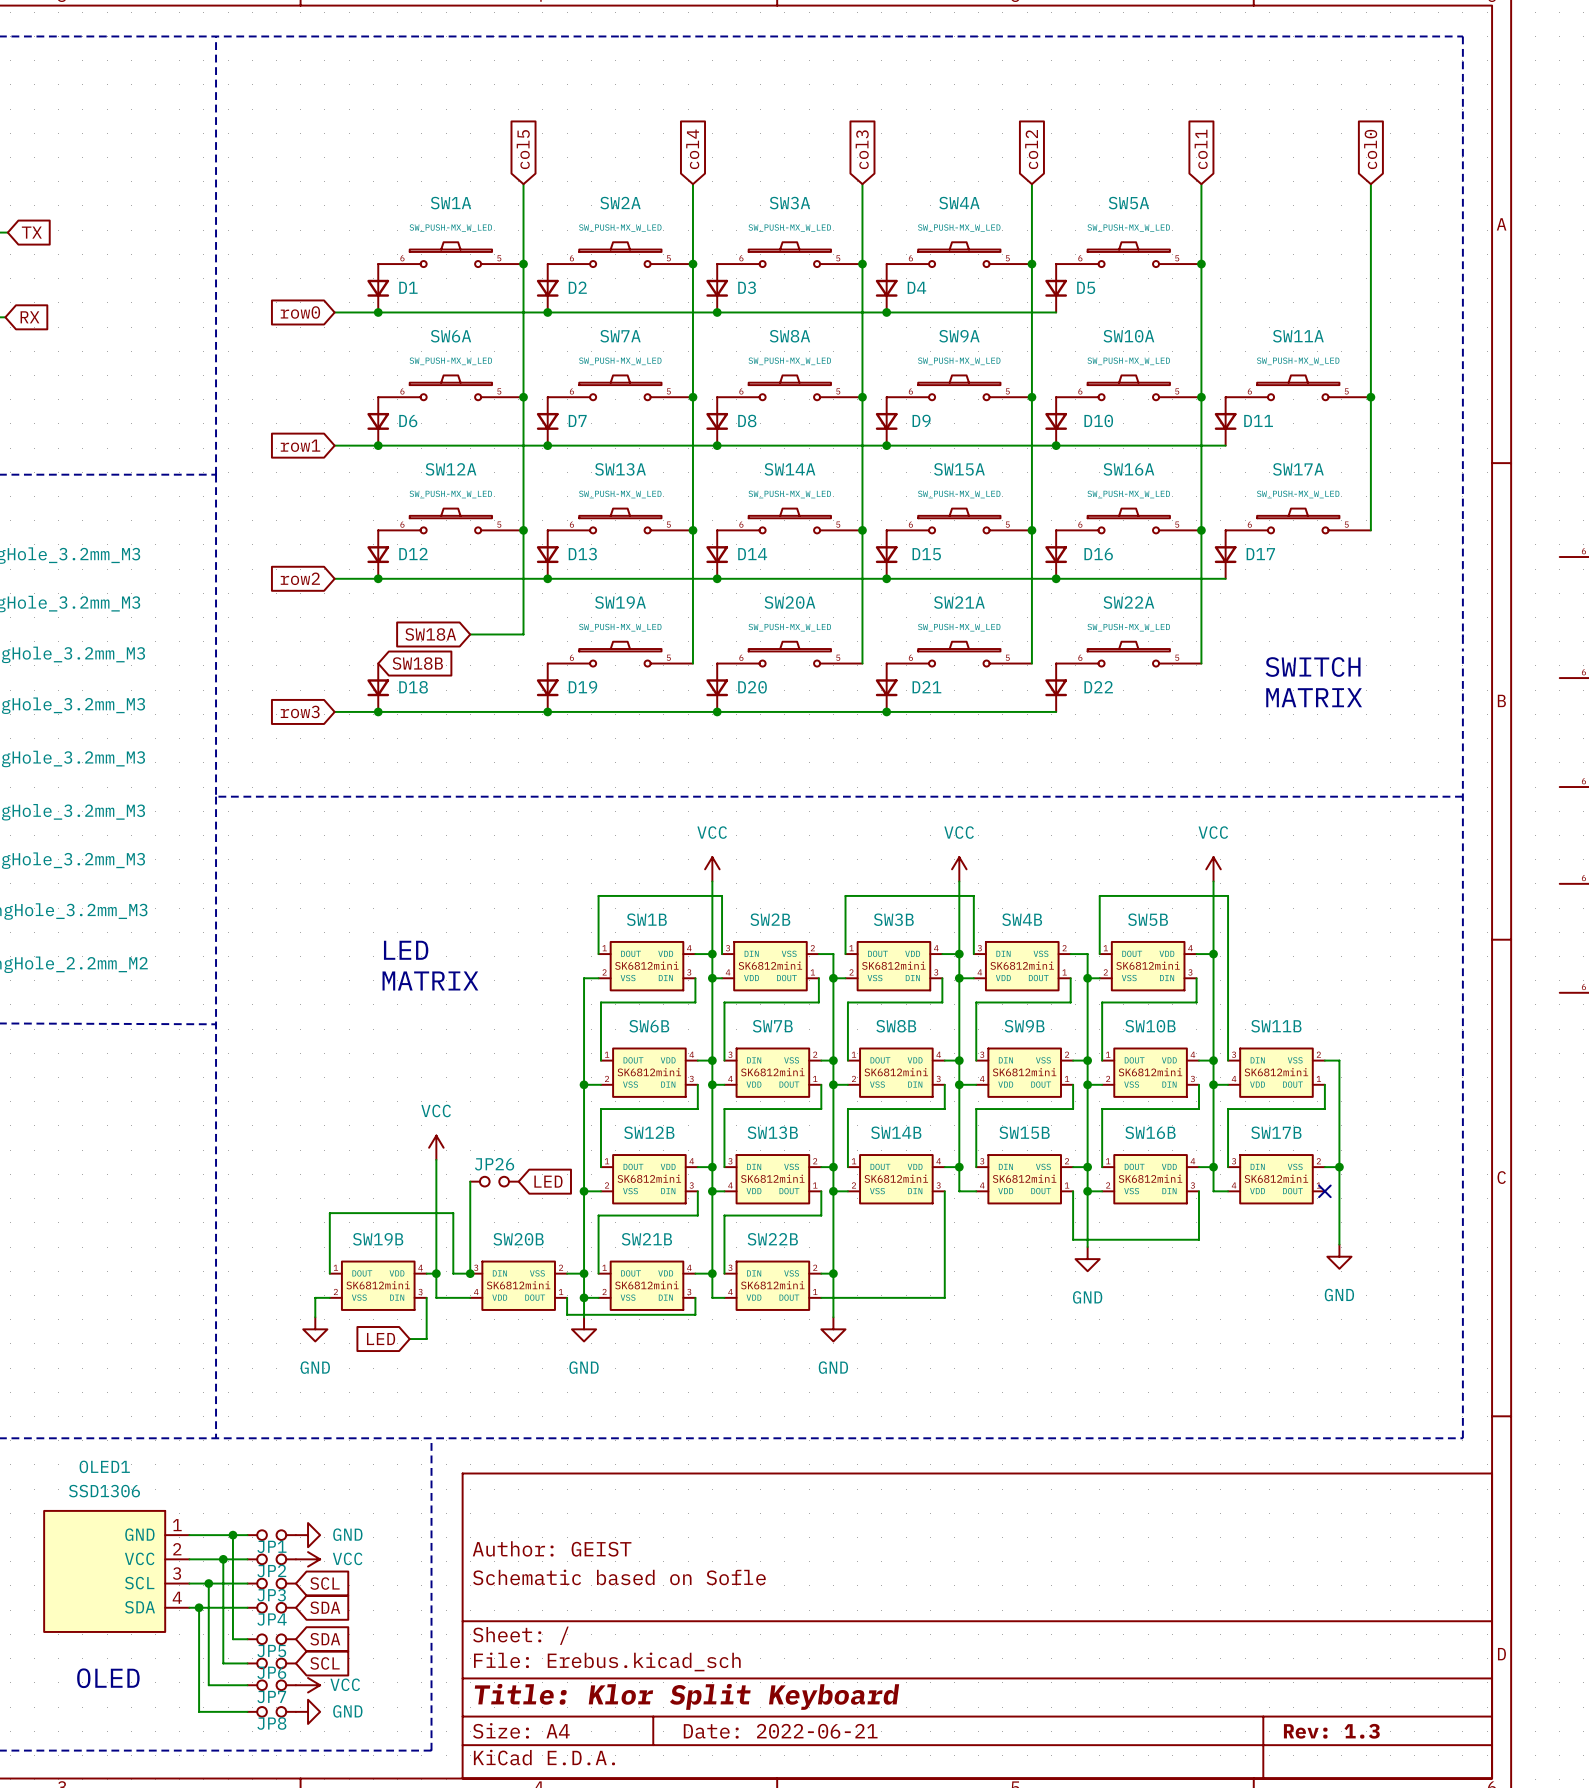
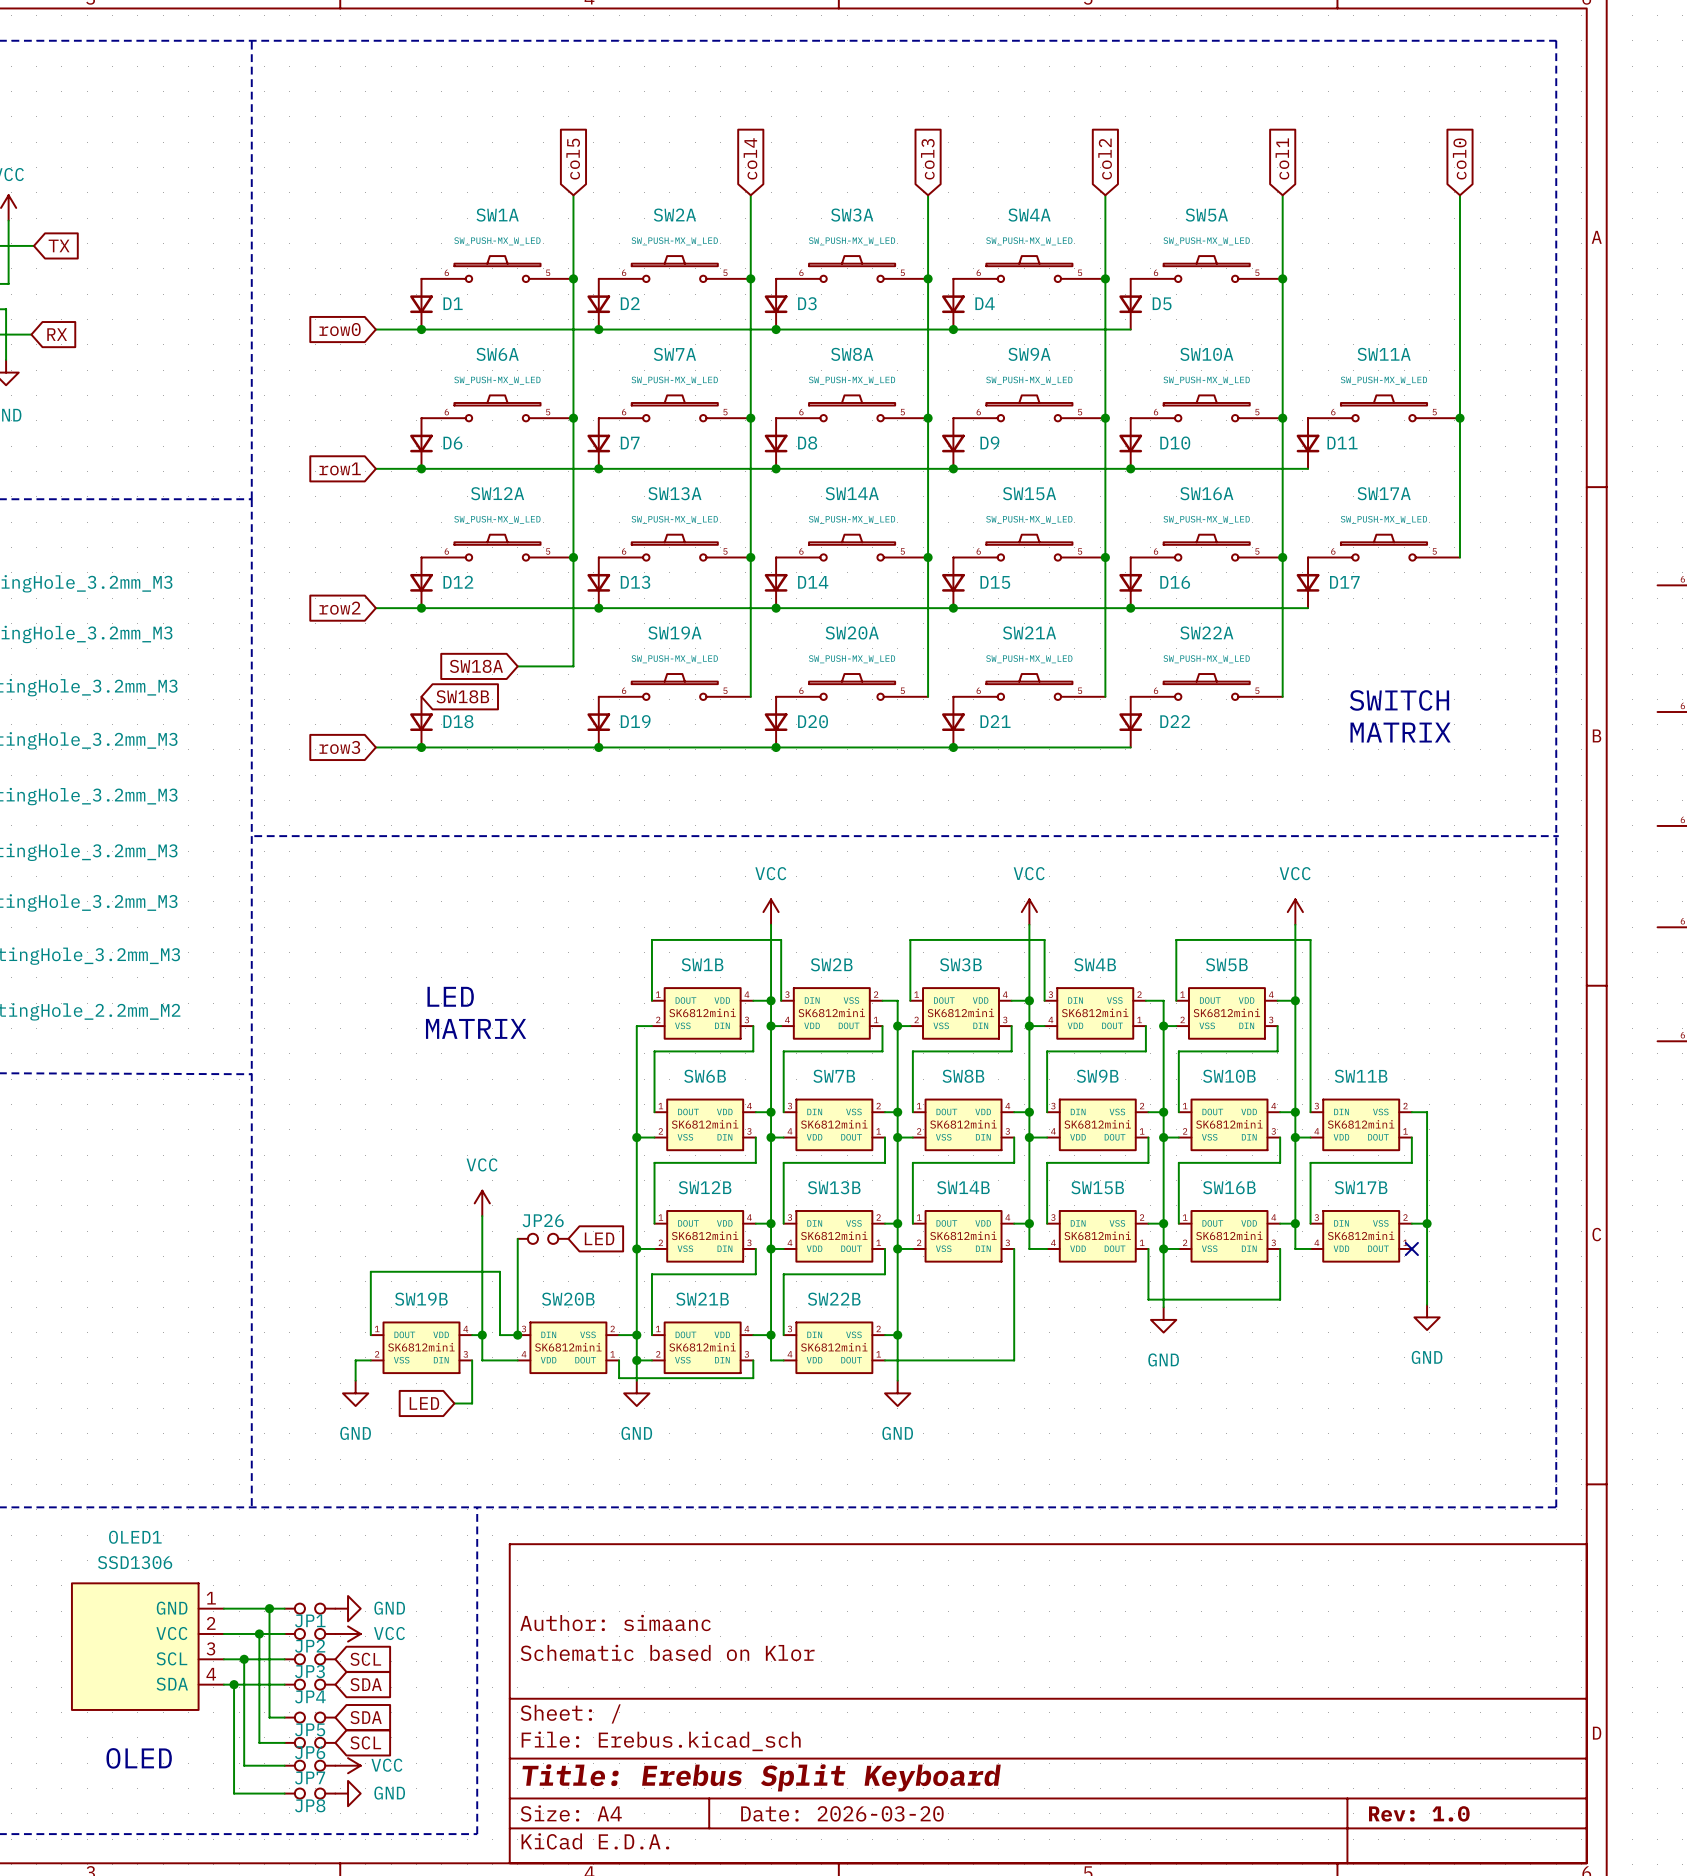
title block: Author: GEIST (552, 1548) -> Author: simaanc (615, 1622)
title block: Schematic based on Sofle (619, 1577) -> Schematic based on Klor (667, 1652)
title block: Title: Klor Split Keyboard (686, 1696) -> Title: Erebus Split Keyboard (761, 1777)
title block: Date: 2022-06-21 (780, 1731) -> Date: 2026-03-20 (842, 1813)
title block: Rev: 1.3 (1331, 1731) -> Rev: 1.0 (1419, 1813)

